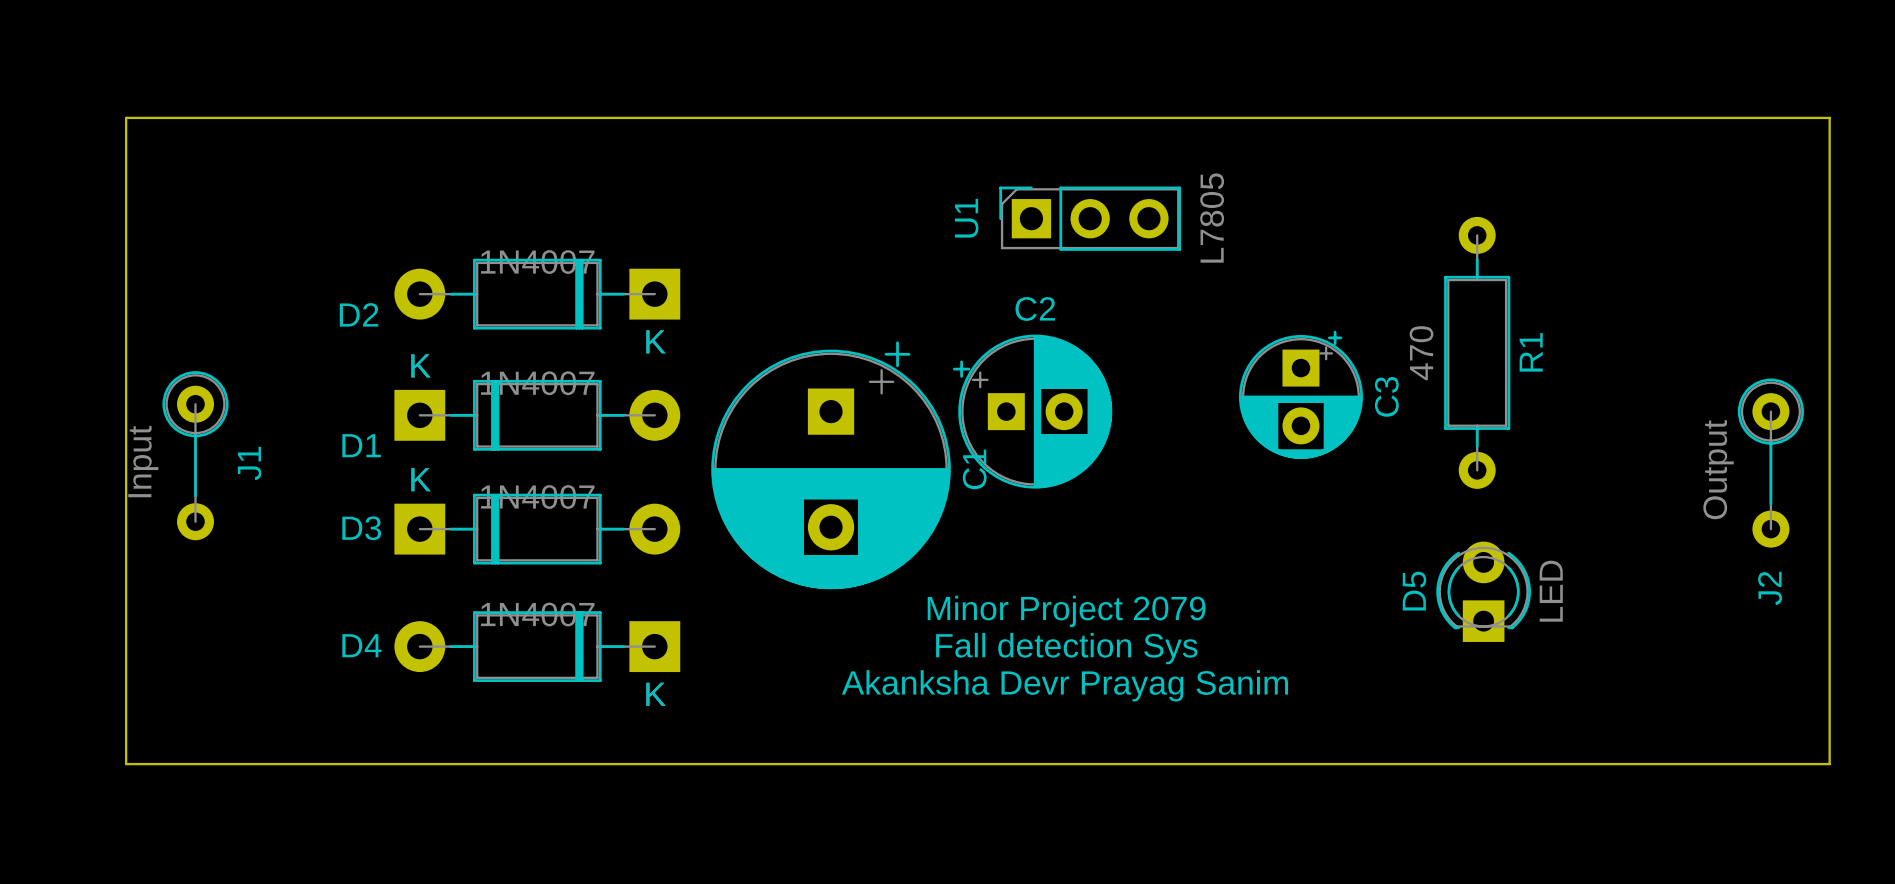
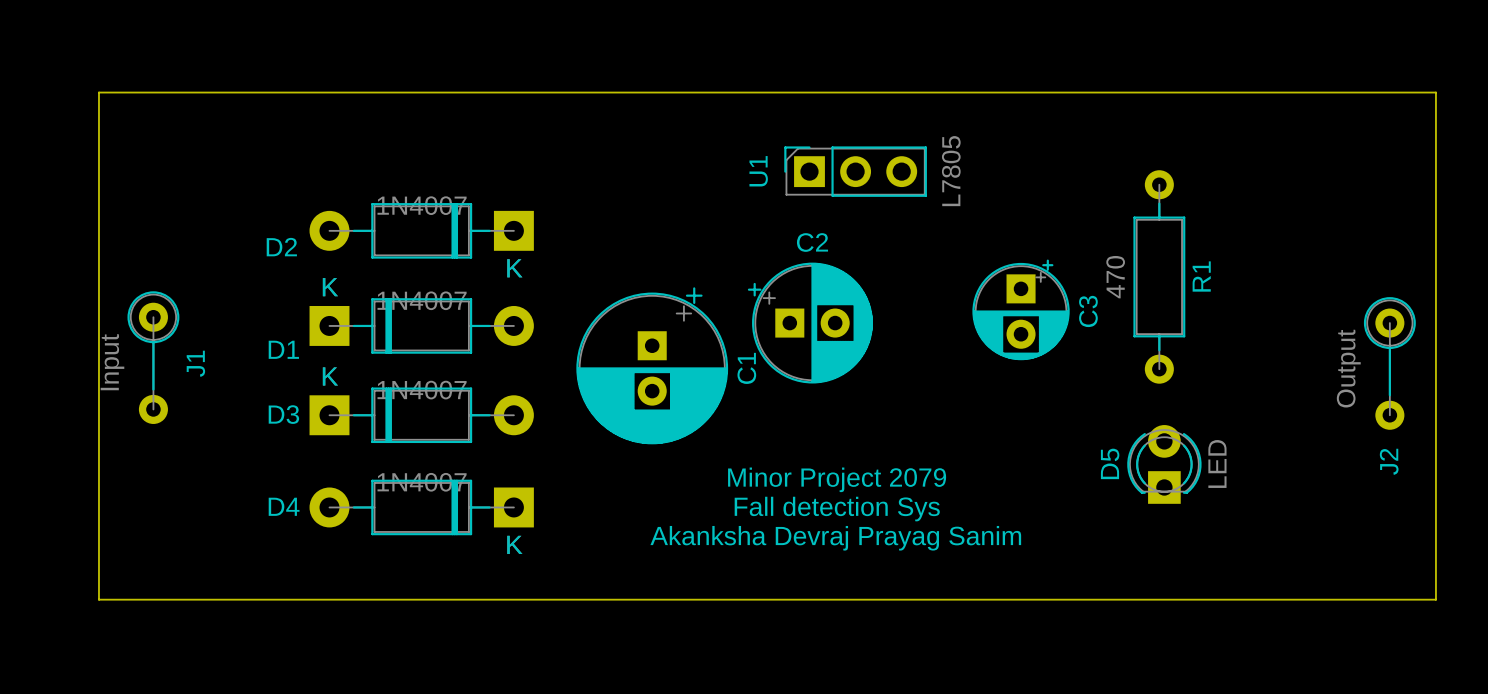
C1 footprint: [711, 341, 951, 590] -> [576, 287, 729, 445]
text: Akanksha Devr Prayag Sanim (1064, 685) -> Akanksha Devraj Prayag Sanim (835, 538)

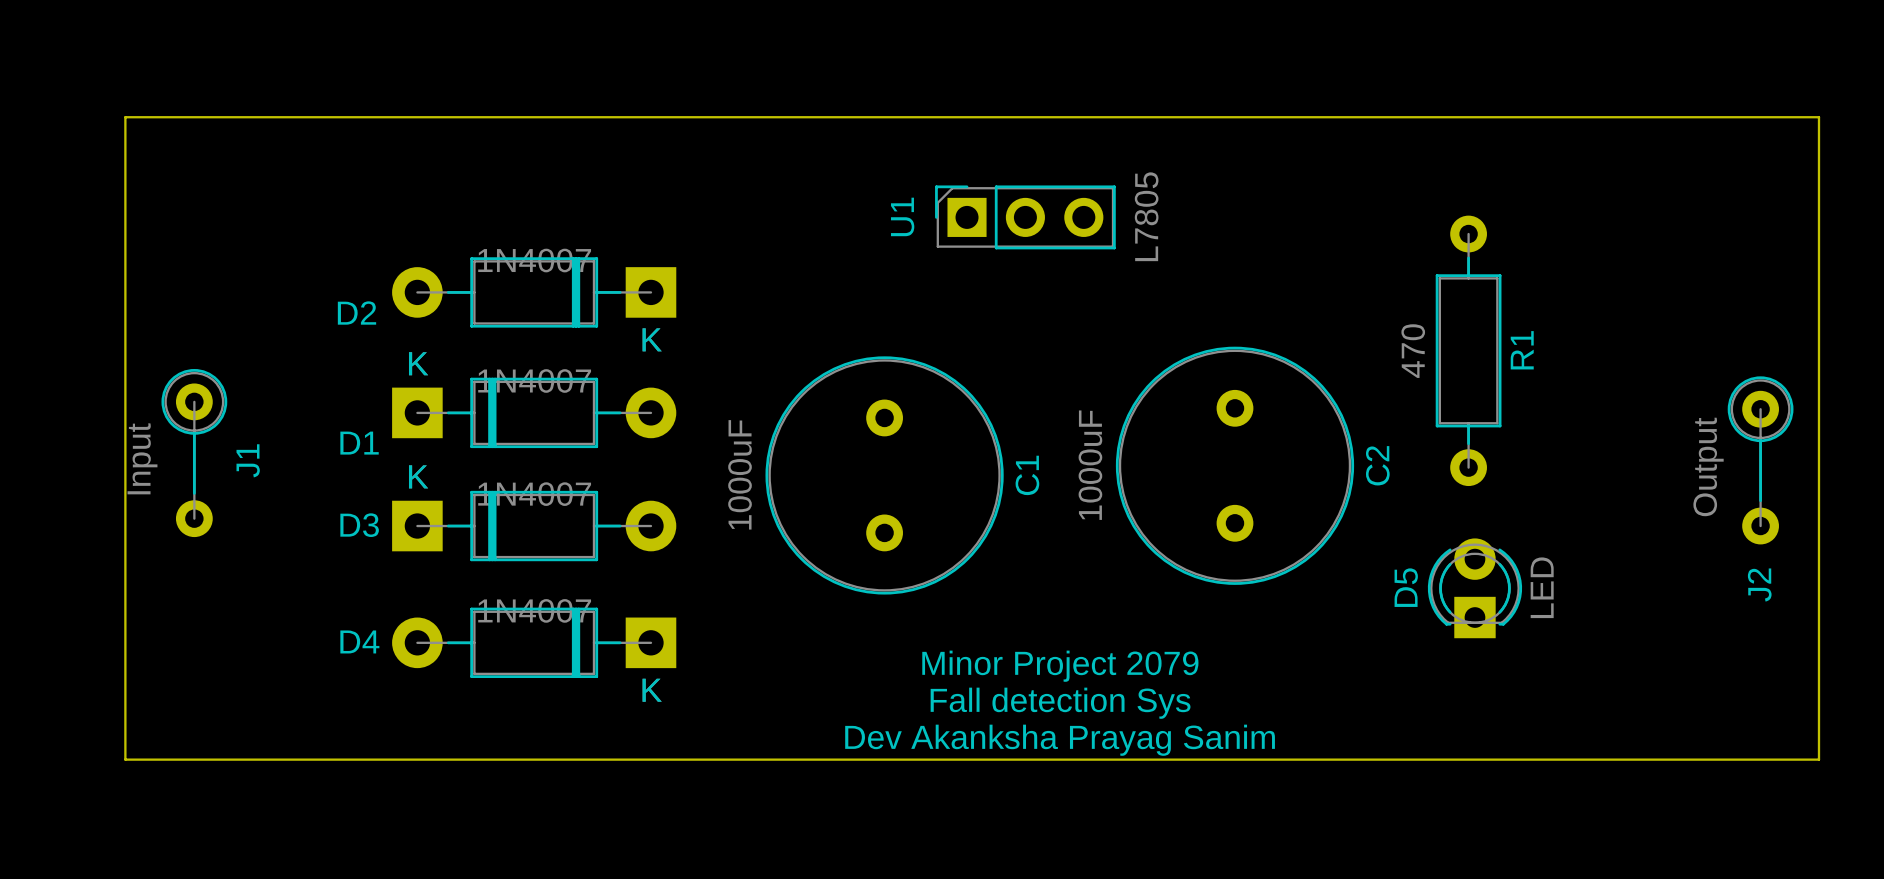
U1 position: (855, 171) -> (1025, 217)
C2 name position: C2 (812, 242) -> C2 (1377, 465)
C2 footprint: [747, 262, 873, 384] -> [1115, 346, 1355, 585]
C1 footprint: [576, 287, 729, 445] -> [765, 356, 1004, 595]
C3: (1021, 309) -> none
C2 value: none -> 1000uF (1090, 465)
C1 value: none -> 1000uF (740, 474)
text position: Minor Project 2079 (837, 479) -> Minor Project 2079 (1060, 666)
text position: Fall detection Sys (837, 509) -> Fall detection Sys (1060, 703)
text: Akanksha Devraj Prayag Sanim (835, 538) -> none
text: none -> Dev Akanksha Prayag Sanim (1060, 740)

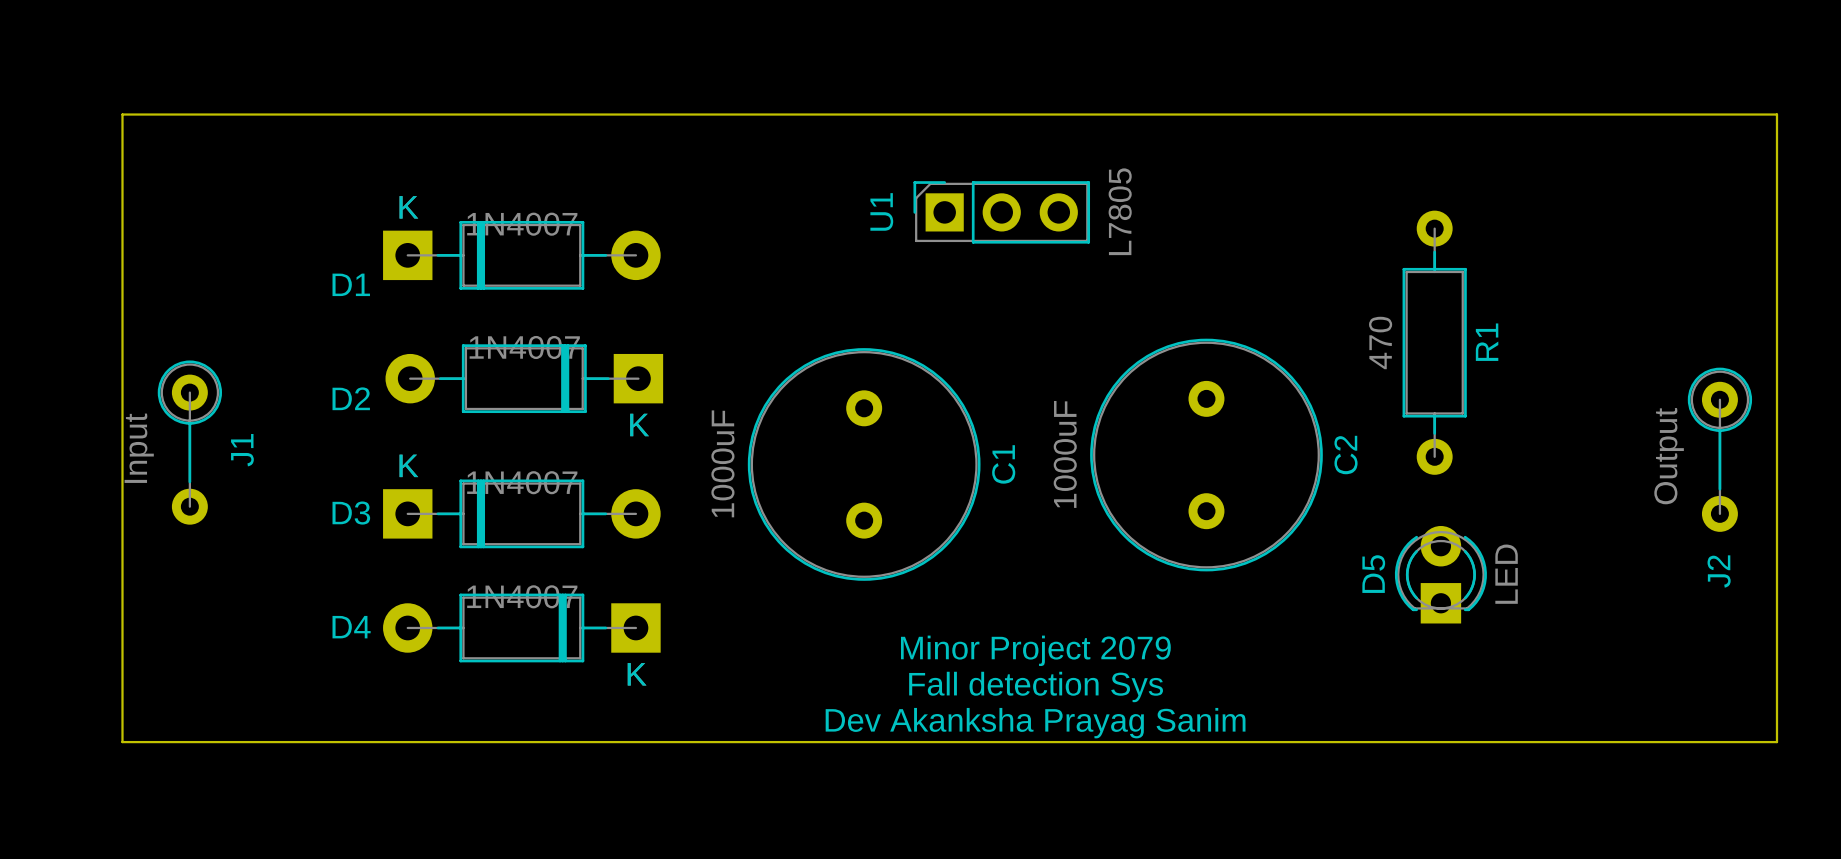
D2 position: (534, 292) -> (524, 378)
D1 position: (534, 412) -> (521, 255)

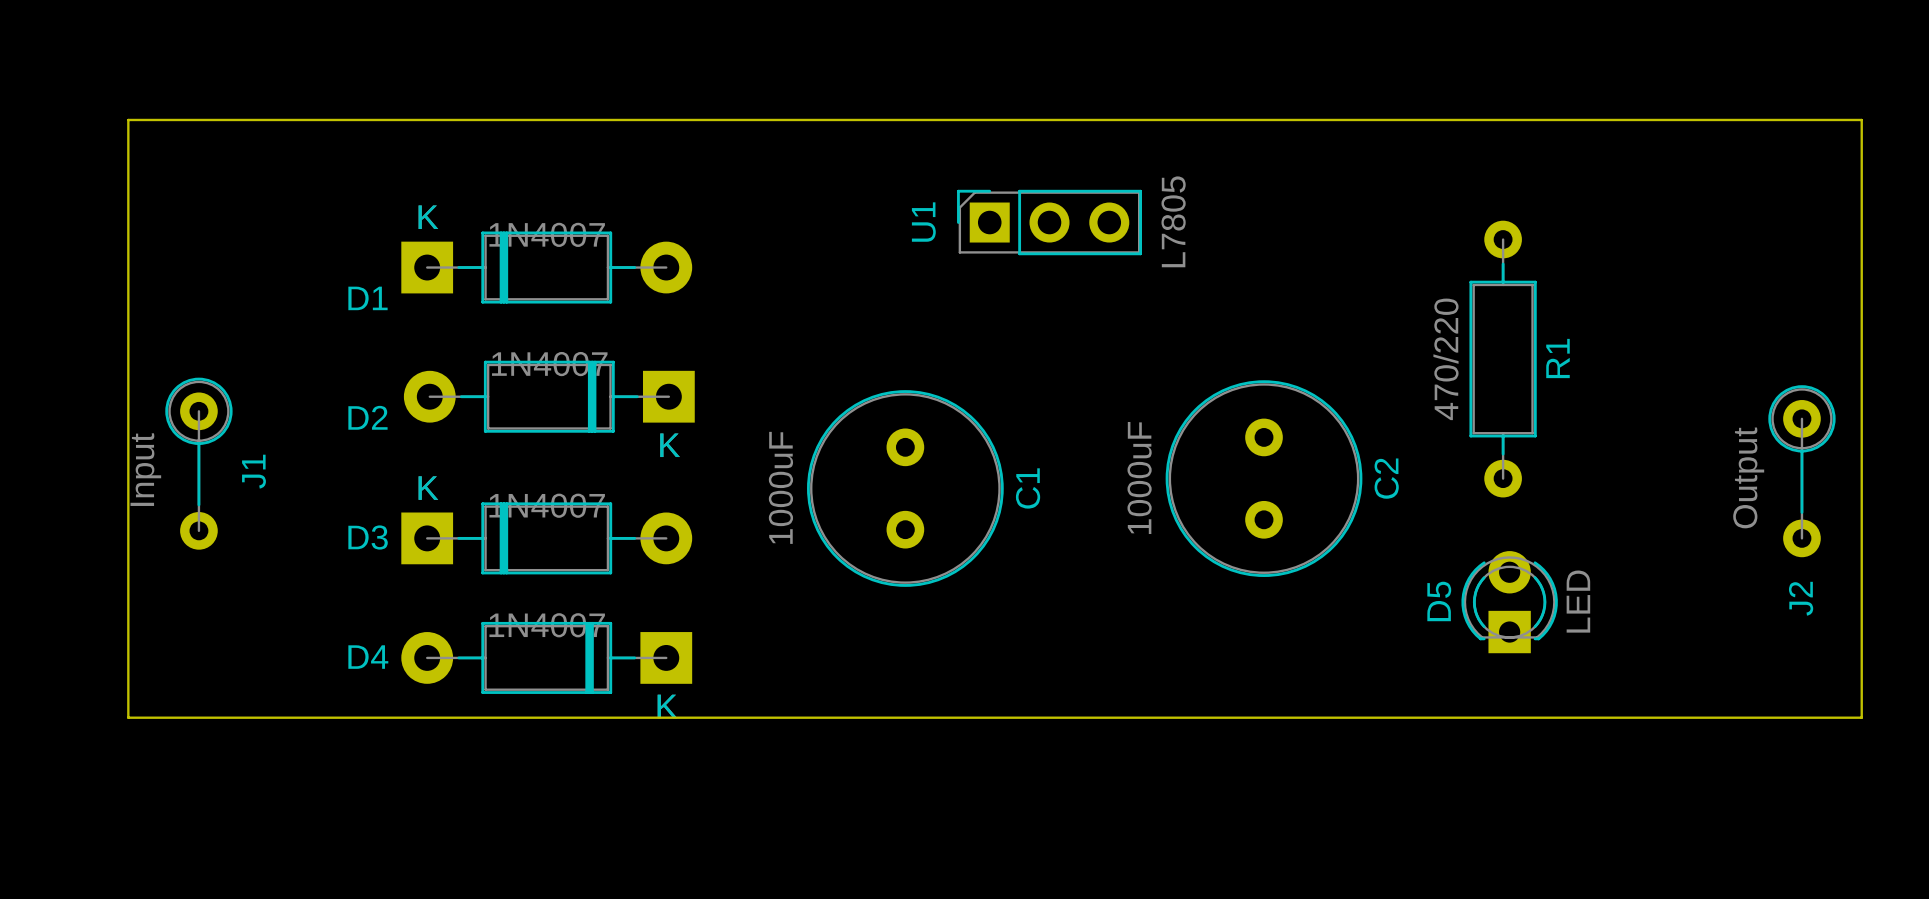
C2 footprint: [1090, 338, 1323, 572] -> [1165, 380, 1363, 577]
R1 value: 470 (1380, 342) -> 470/220 (1445, 359)
C1 footprint: [747, 348, 981, 581] -> [807, 390, 1004, 587]
text: Minor Project 2079 (1035, 650) -> none
board edge: (122, 685) (122, 742) (1776, 742) (1776, 685) -> (128, 717) (1861, 717)
text: Fall detection Sys (1036, 686) -> none
text: Dev Akanksha Prayag Sanim (1035, 723) -> none

